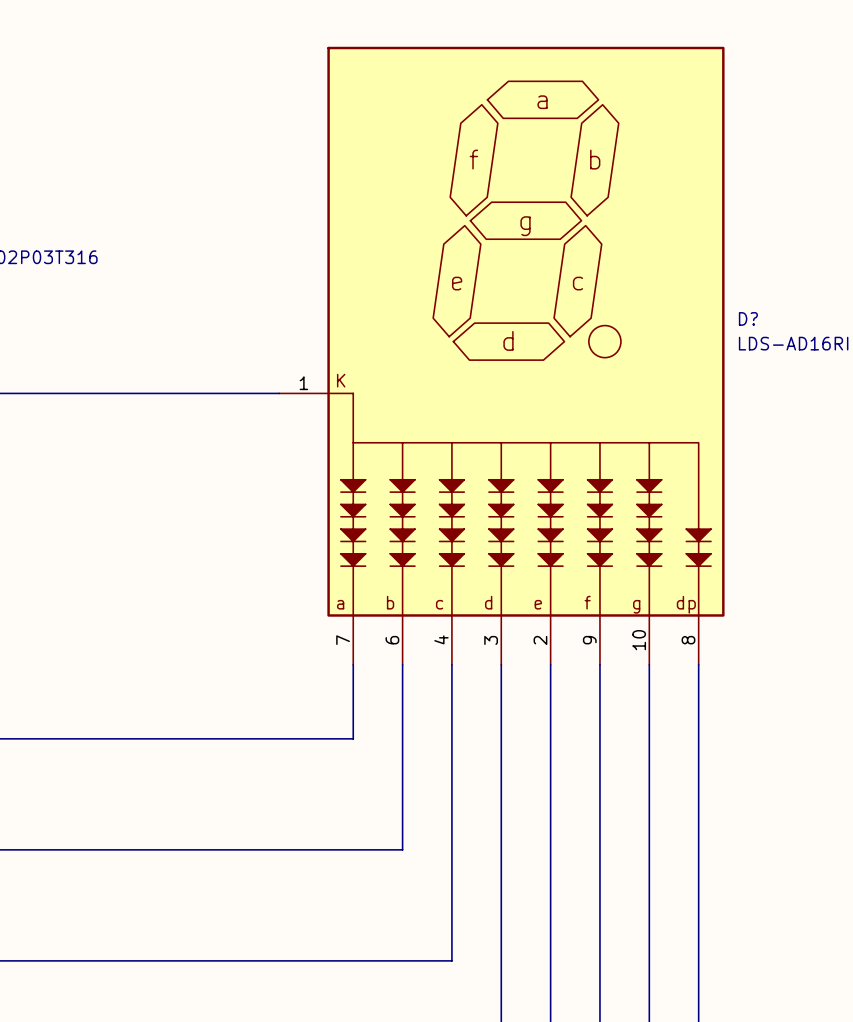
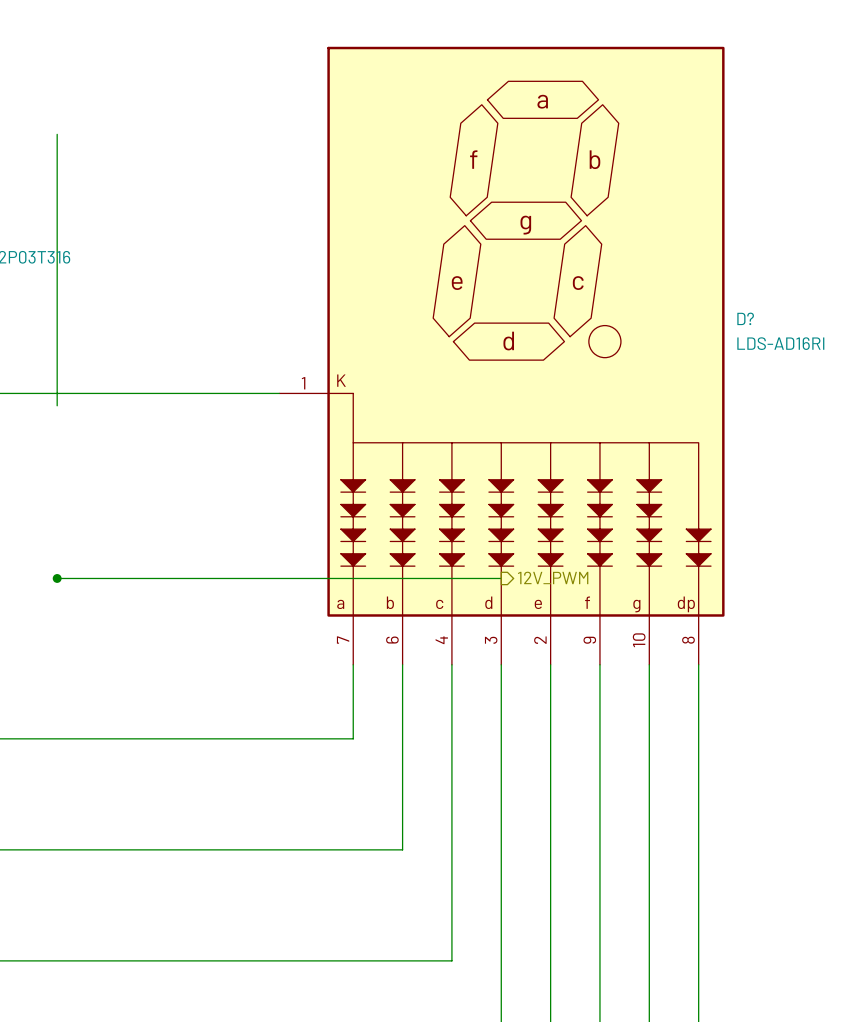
wire: none -> (57, 134) (57, 405)
wire: none -> (57, 578) (501, 578)
junction: none -> (57, 578)
hierarchical label: none -> 12V_PWM (553, 577)

